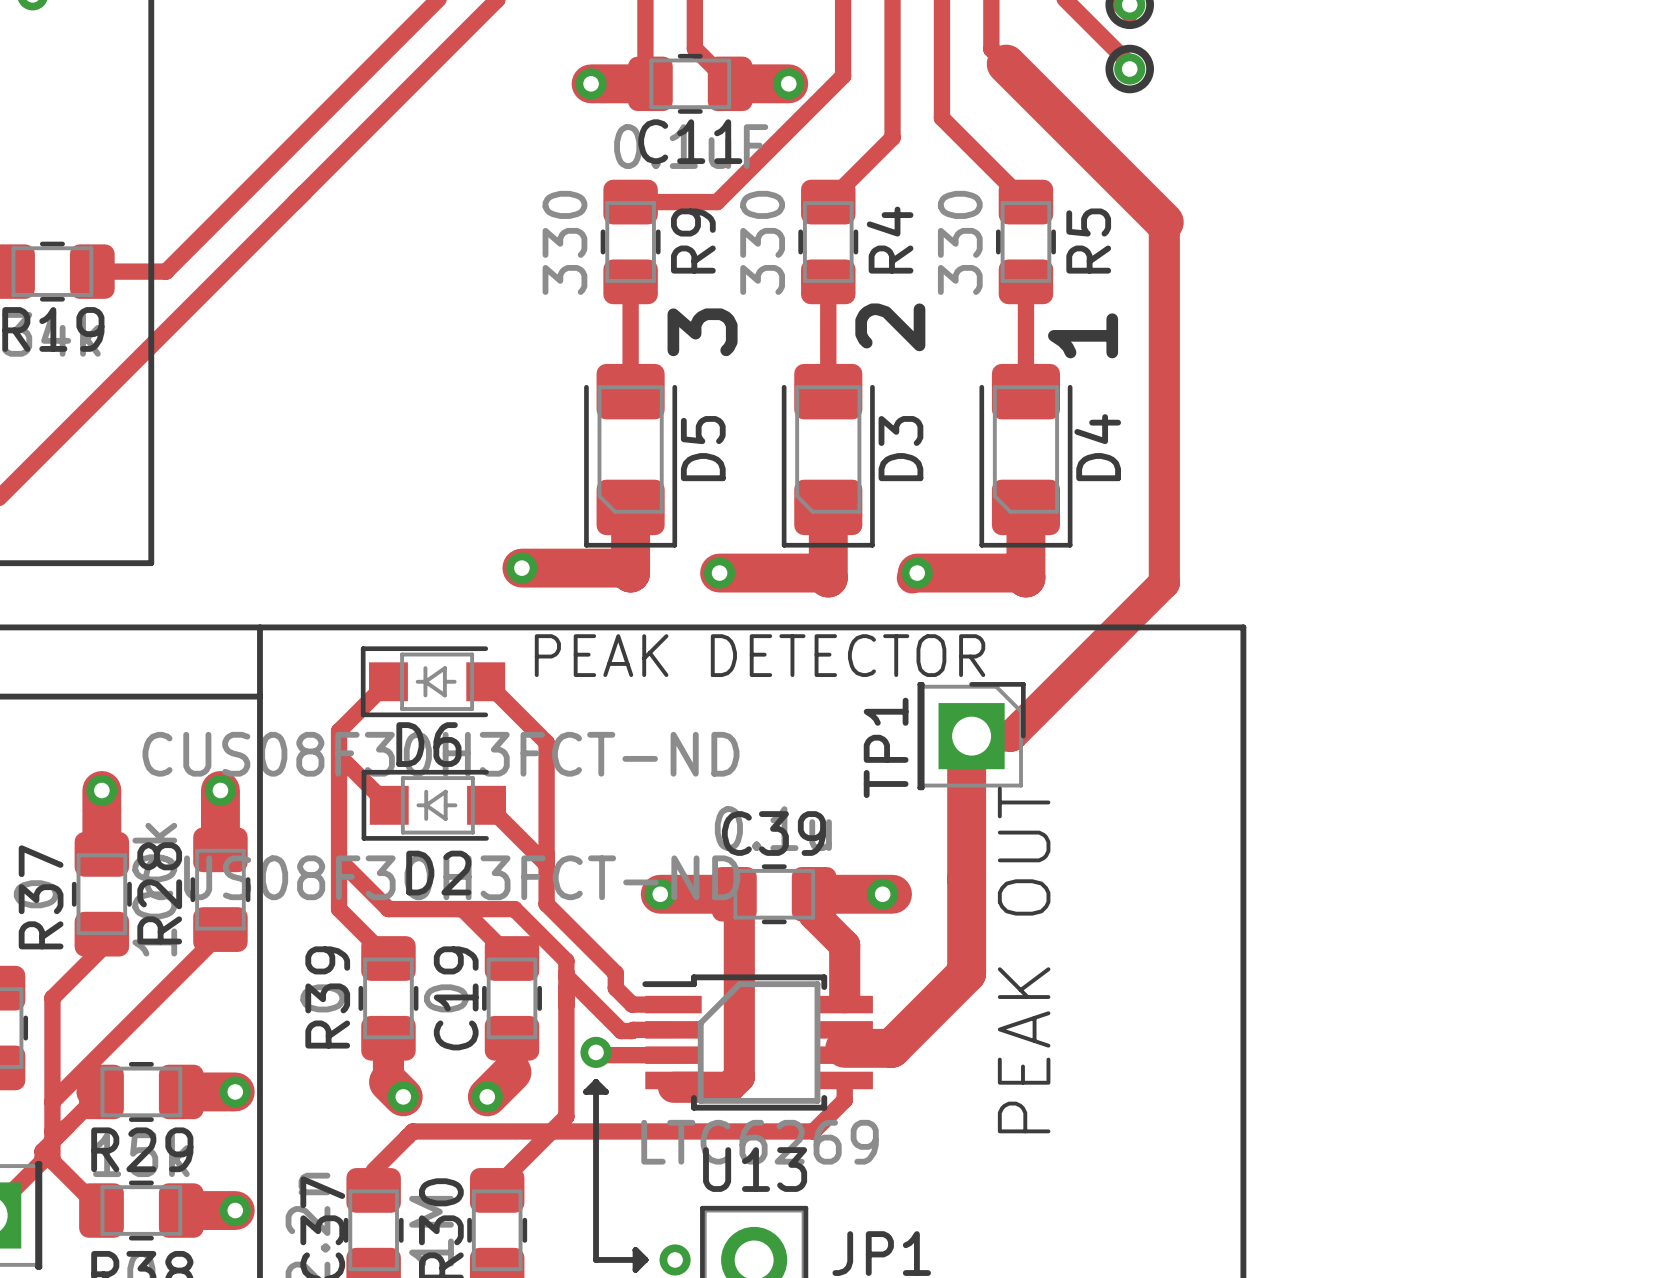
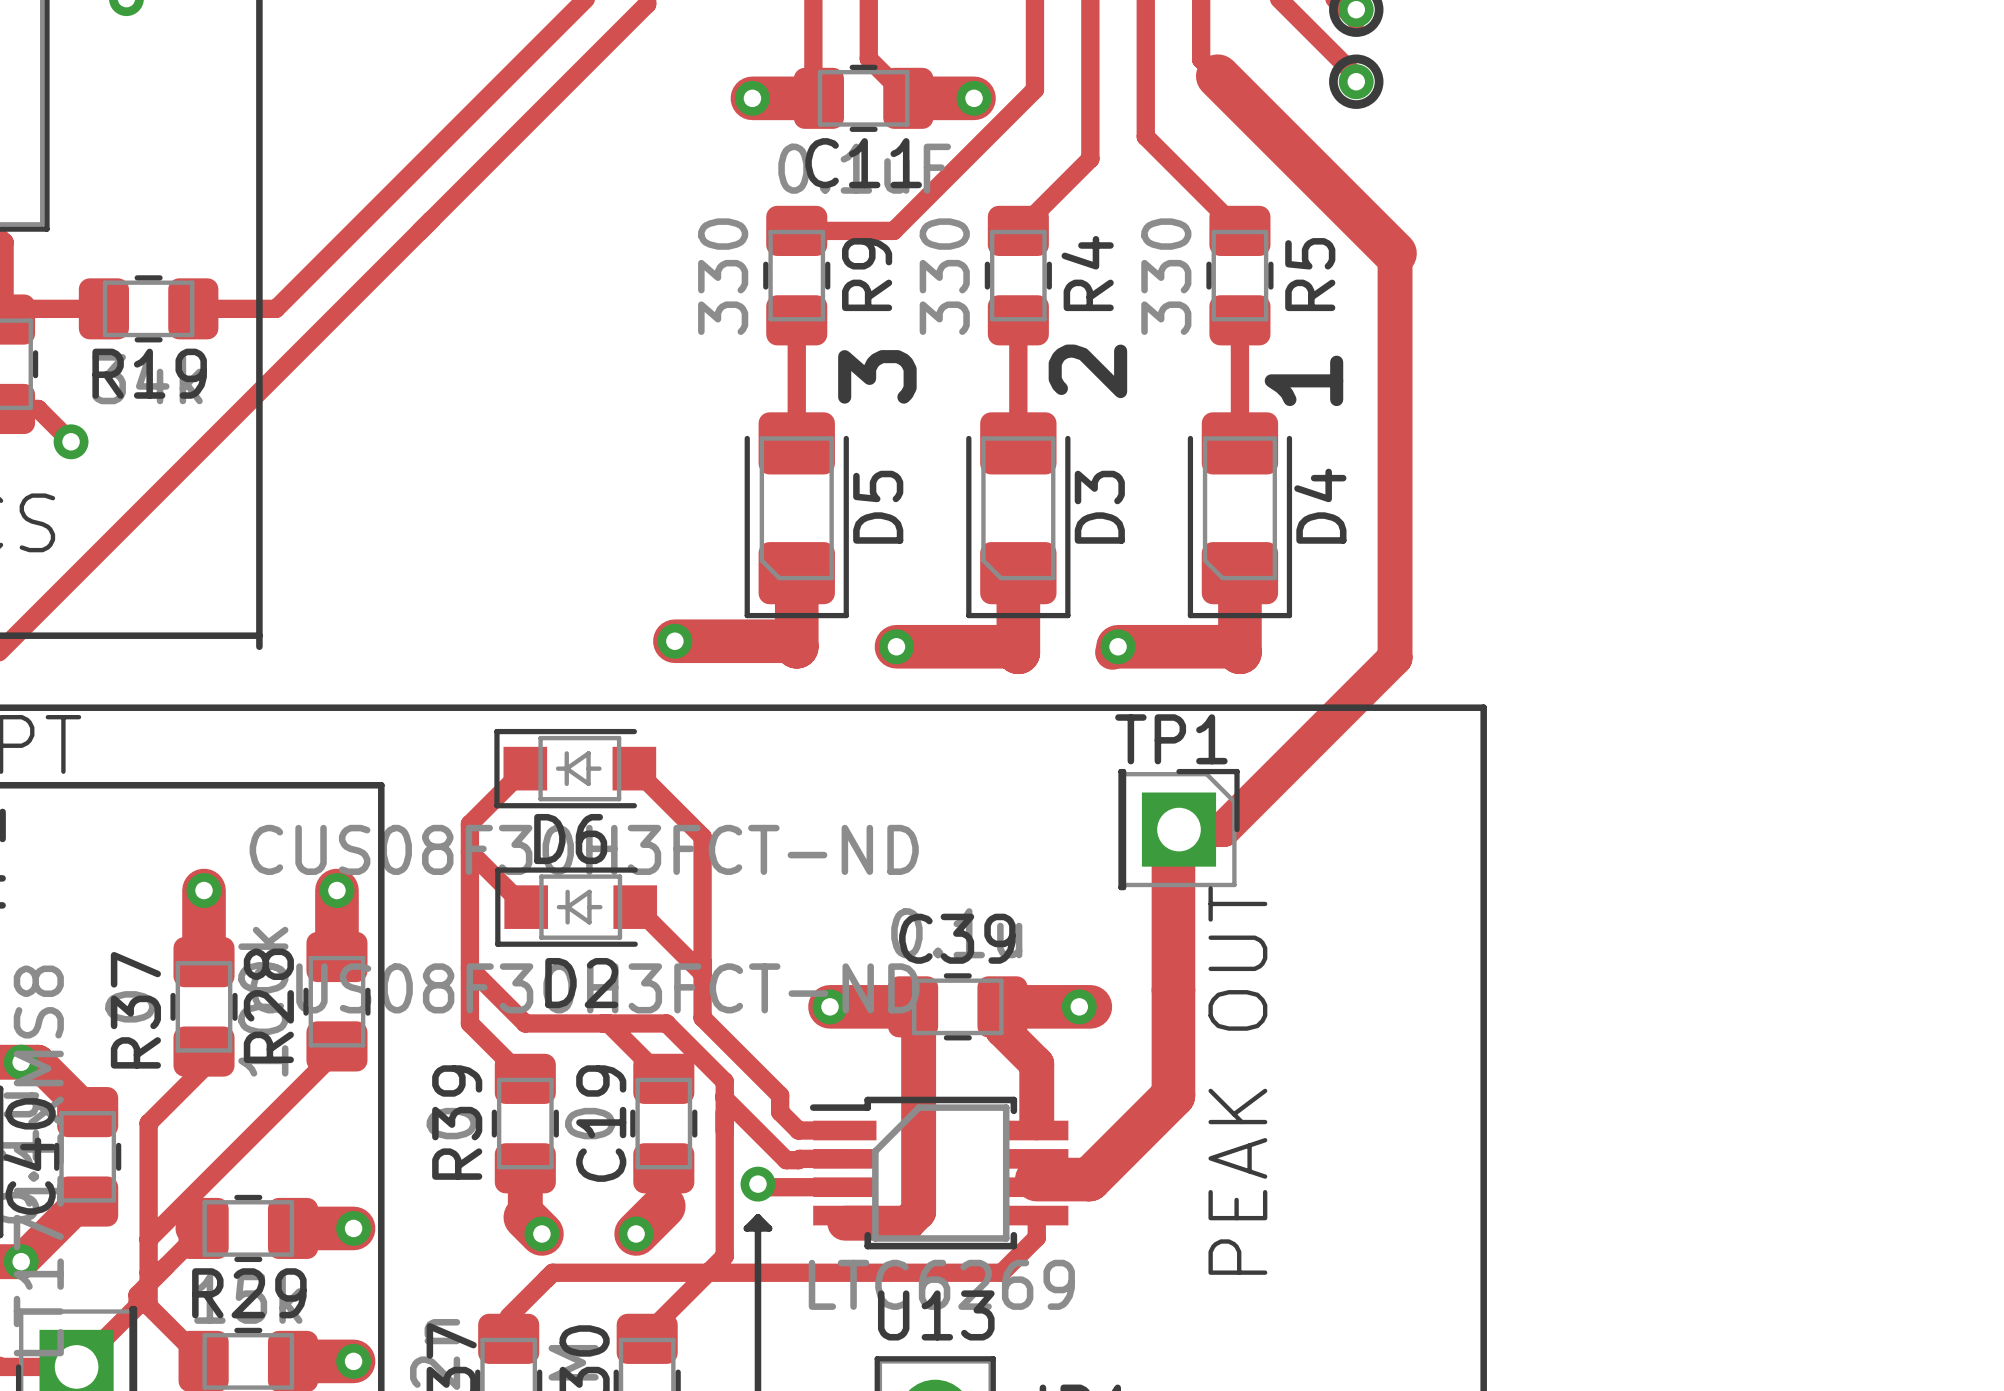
line: none -> (259, 635) (259, 646)
line: (259, 627) (259, 696) -> none
text: PEAK DETECTOR (760, 655) -> none
TP1 name rotation: 0° (886, 747) -> 90° clockwise (1171, 739)

